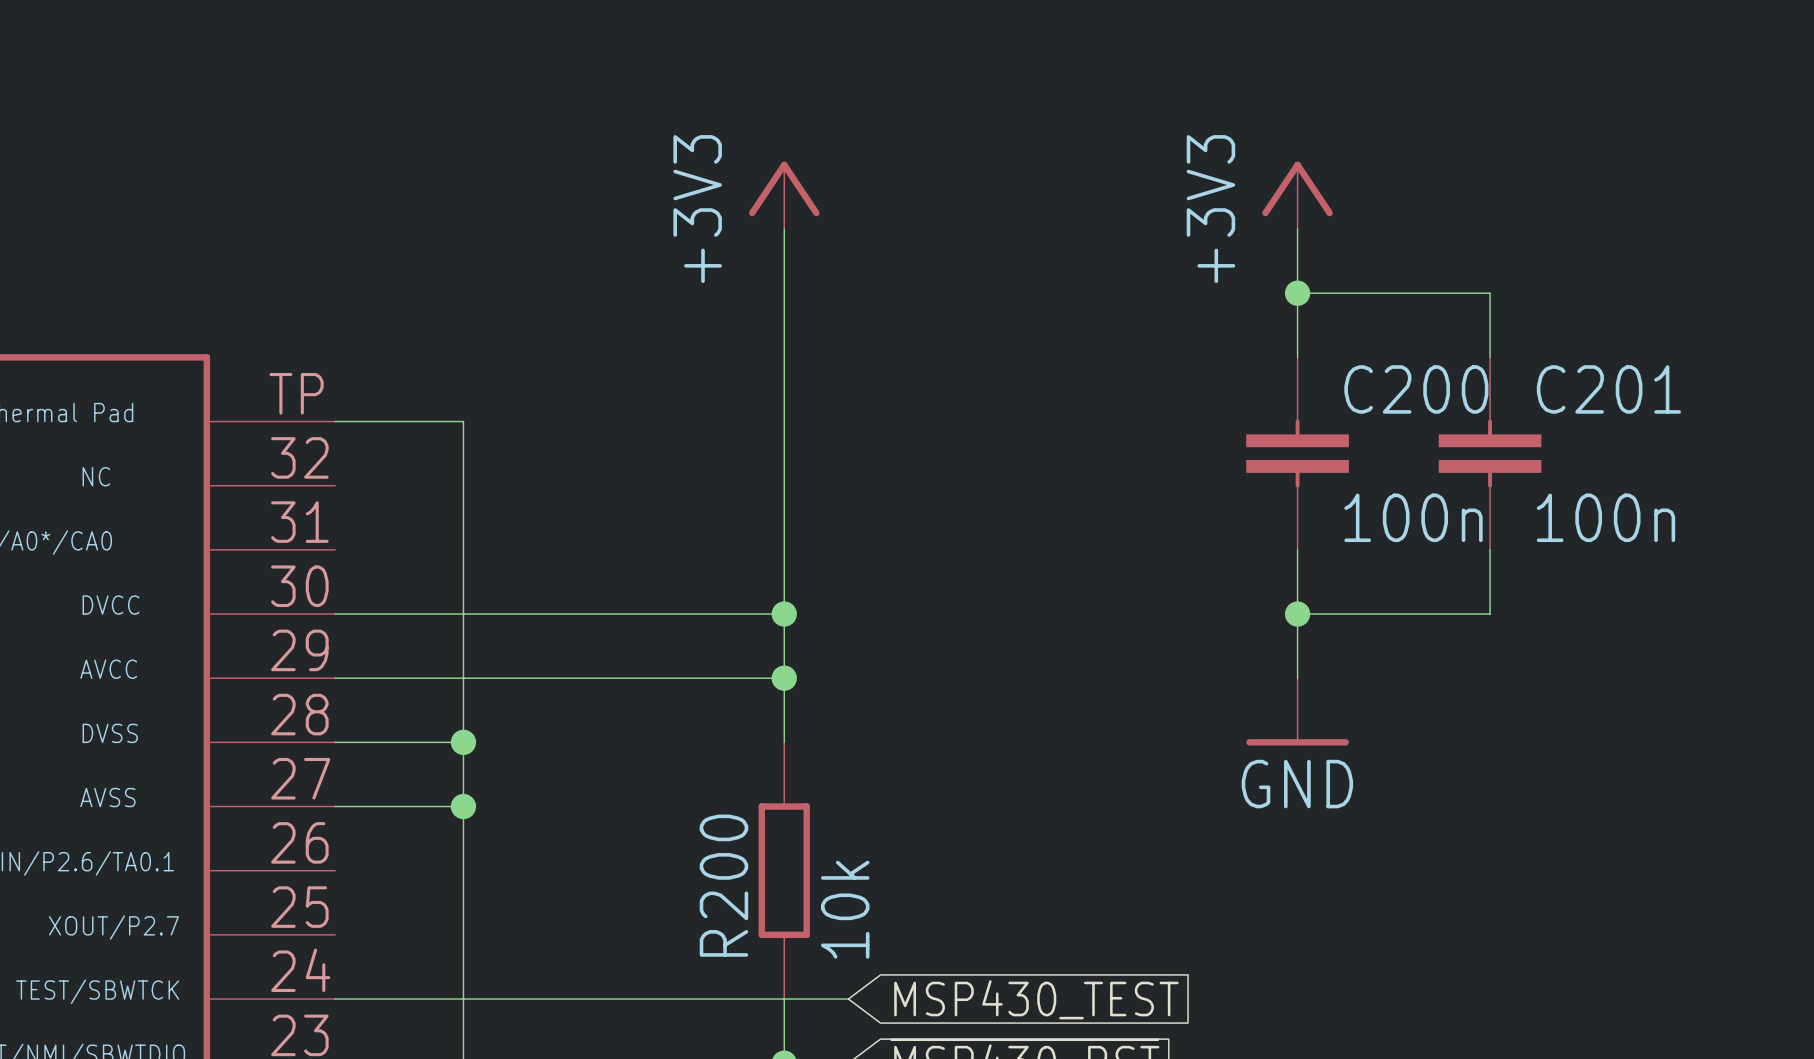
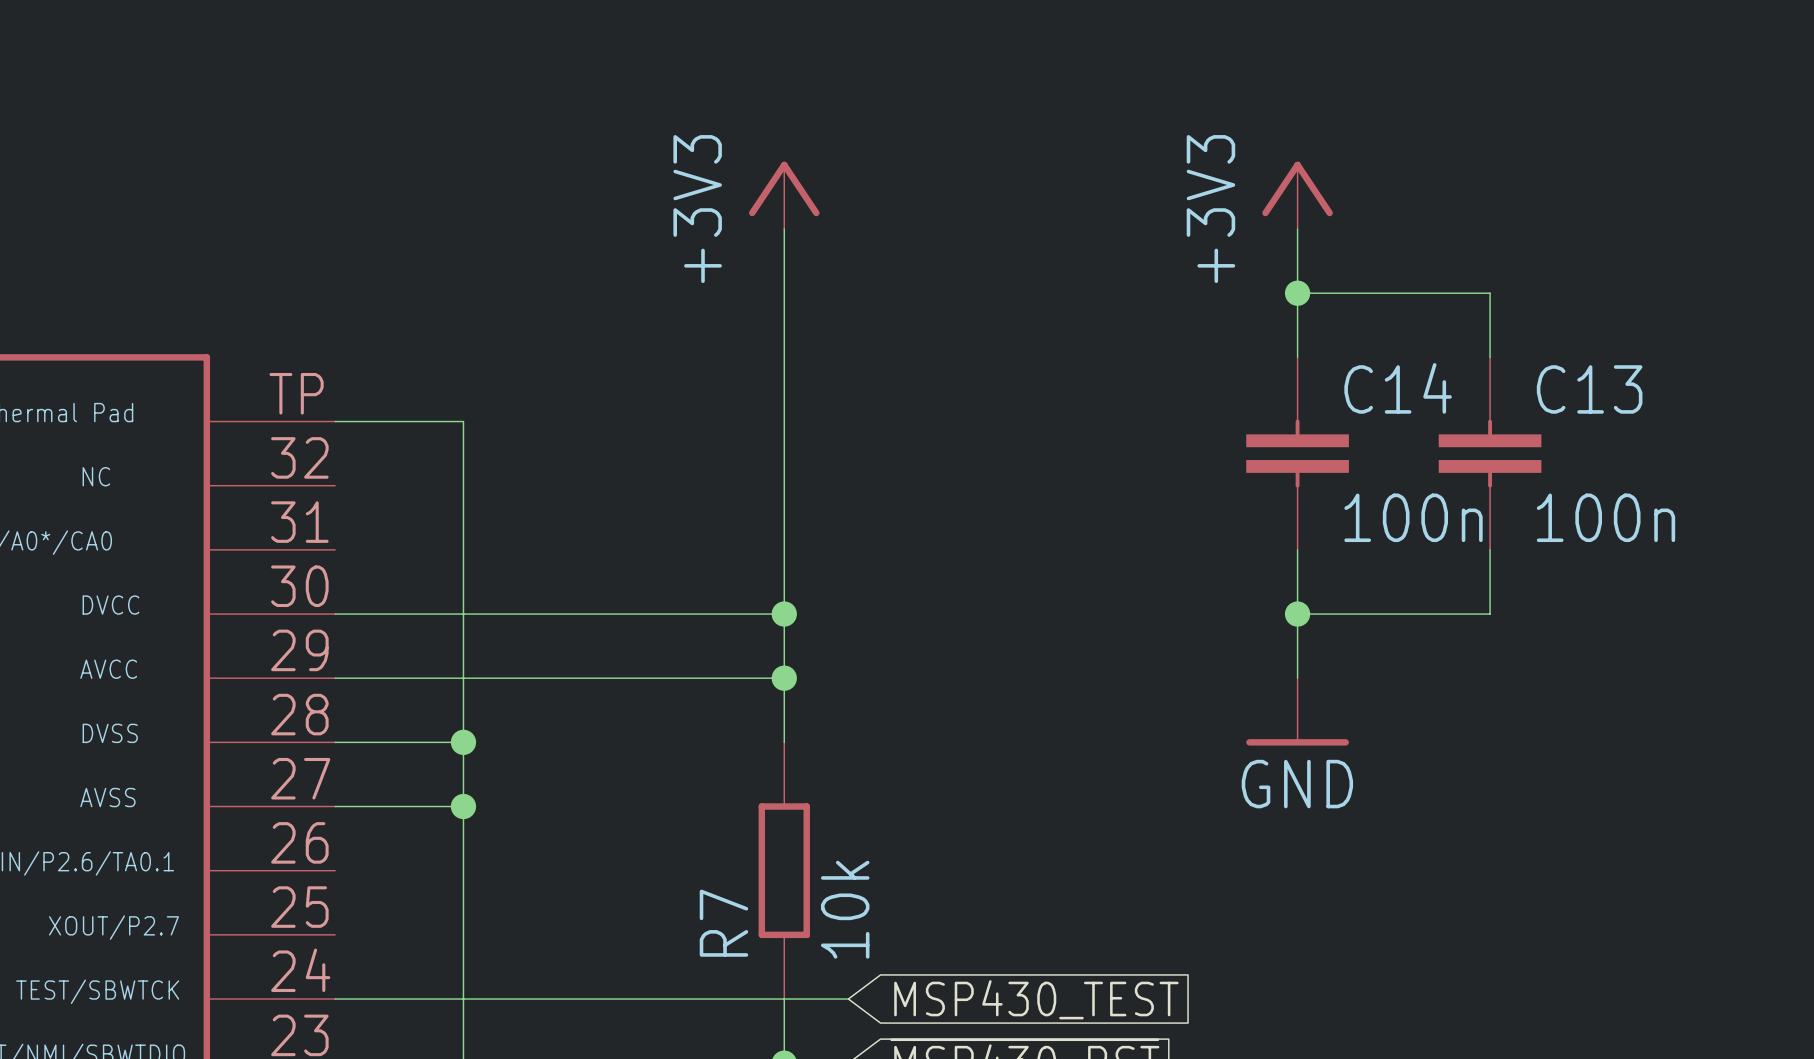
C200 name: C200 (1416, 389) -> C14 (1398, 388)
C201 name: C201 (1608, 389) -> C13 (1589, 389)
R200 name: R200 (723, 885) -> R7 (723, 923)

